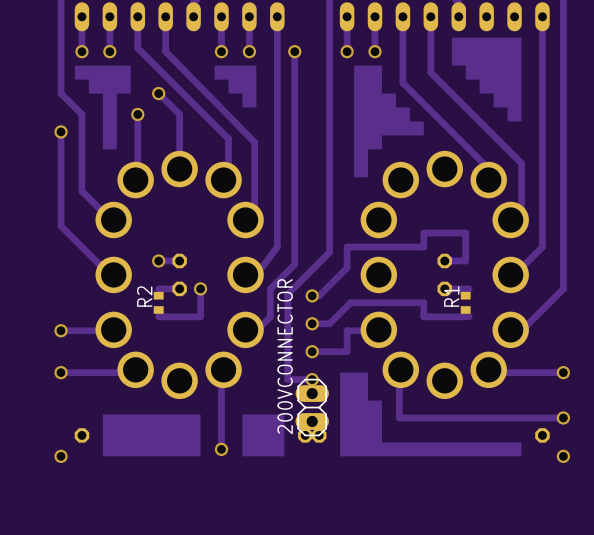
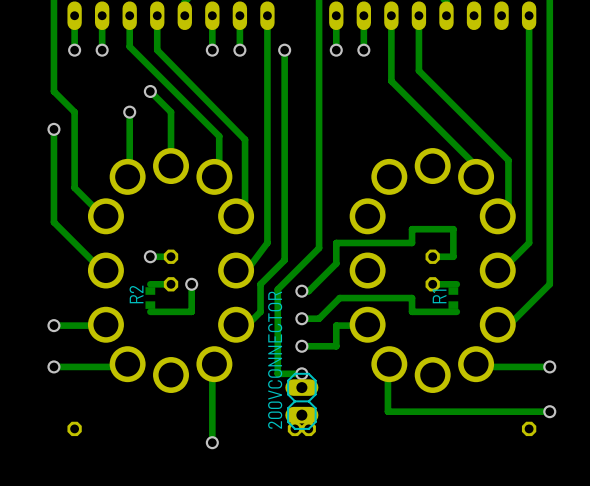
drawing: [451, 37, 522, 122] -> none
drawing: [74, 65, 131, 150] -> none
drawing: [214, 65, 257, 108] -> none
drawing: [354, 65, 424, 178] -> none
drawing: [340, 372, 522, 457] -> none
drawing: [102, 414, 201, 457] -> none
drawing: [242, 414, 285, 457] -> none
via: (61, 456) -> none
via: (563, 456) -> none

